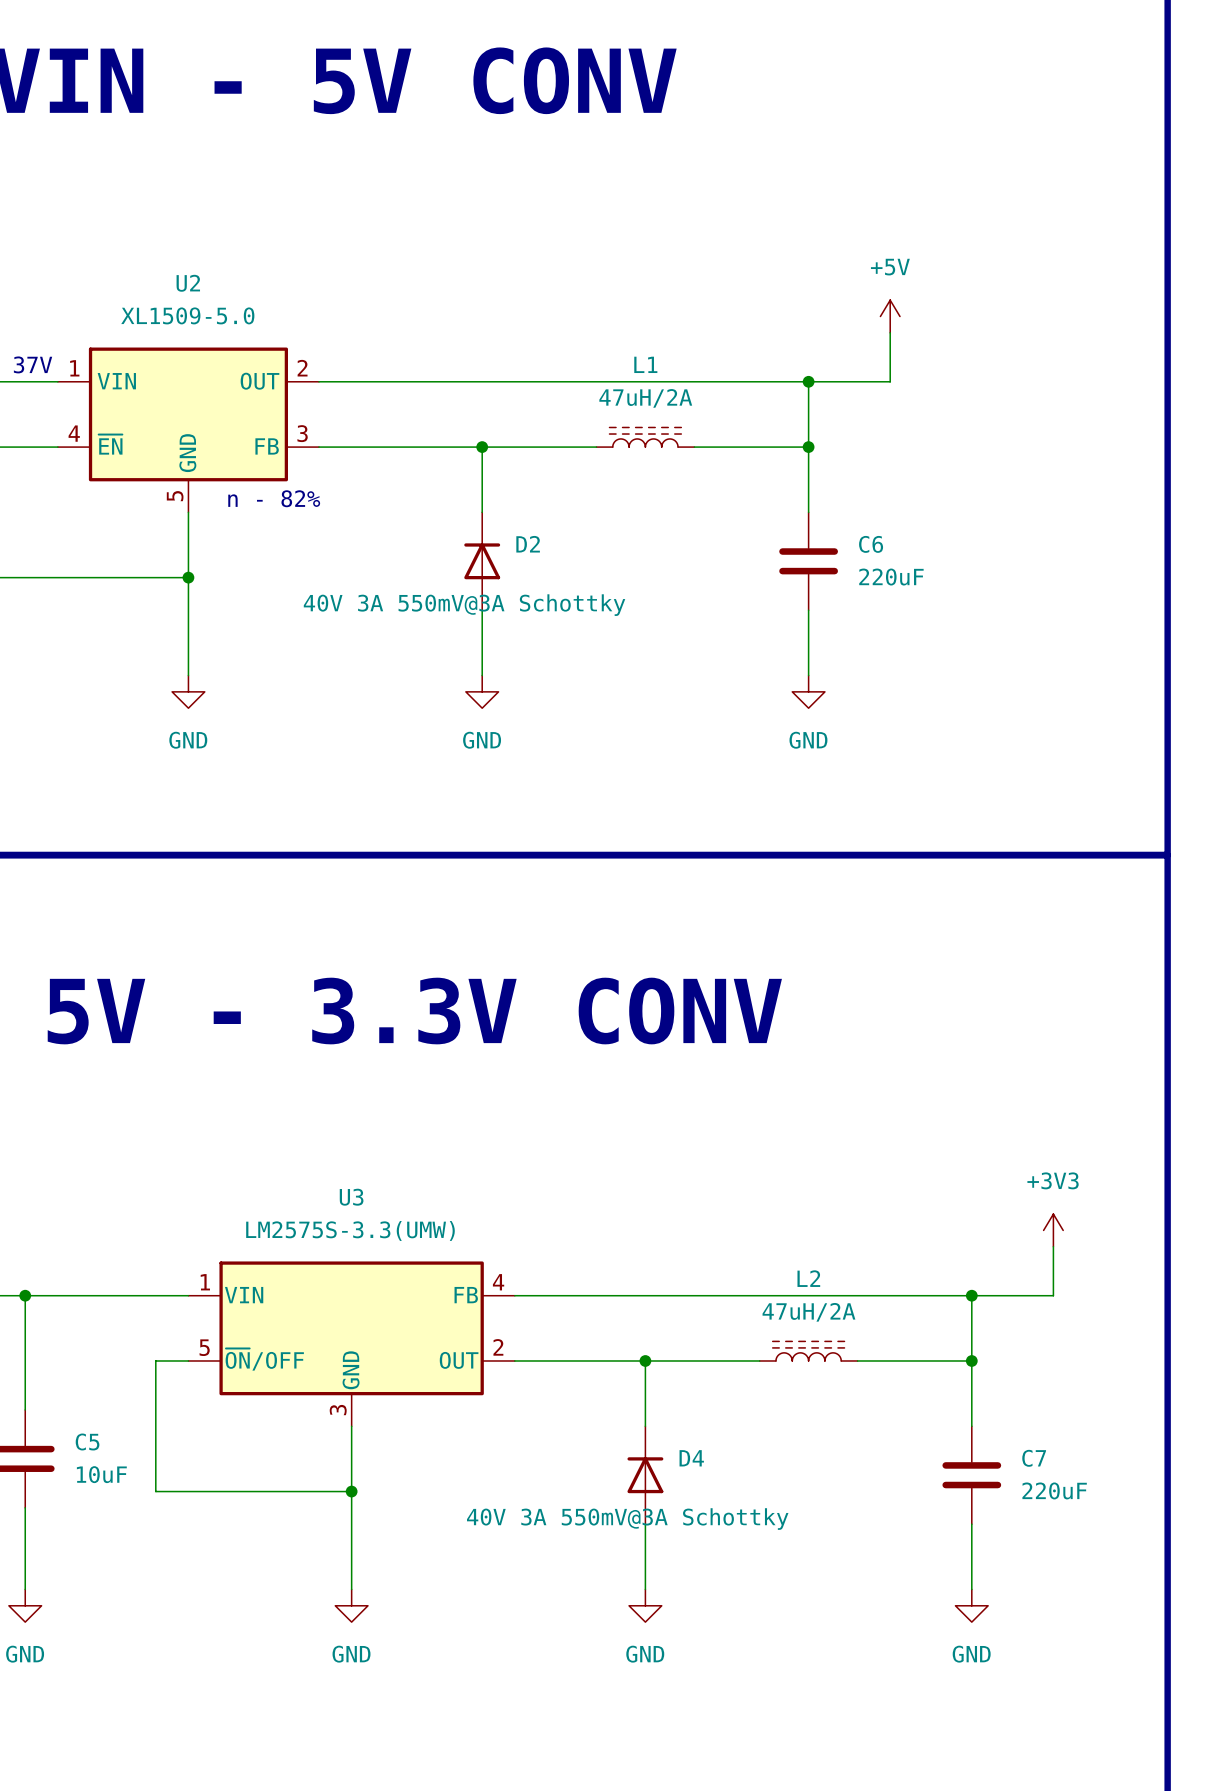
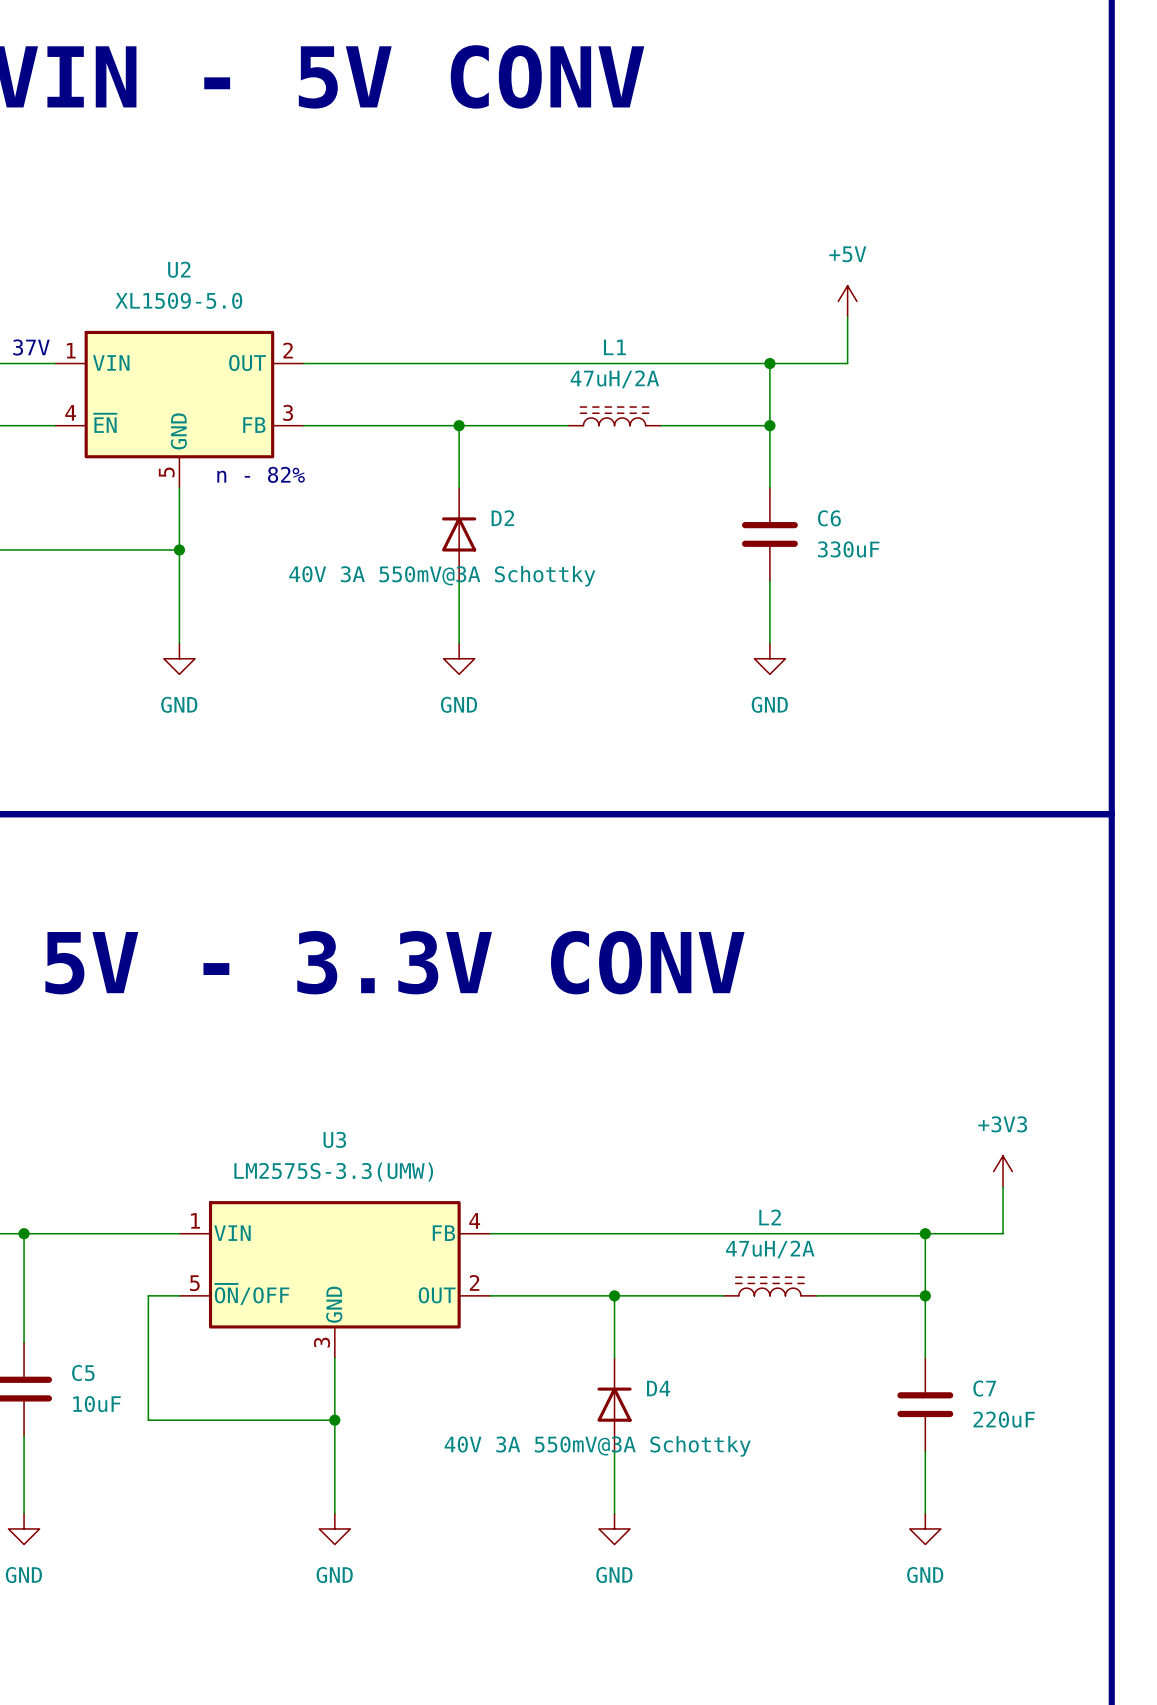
C6 value: 220uF (891, 577) -> 330uF (848, 549)

